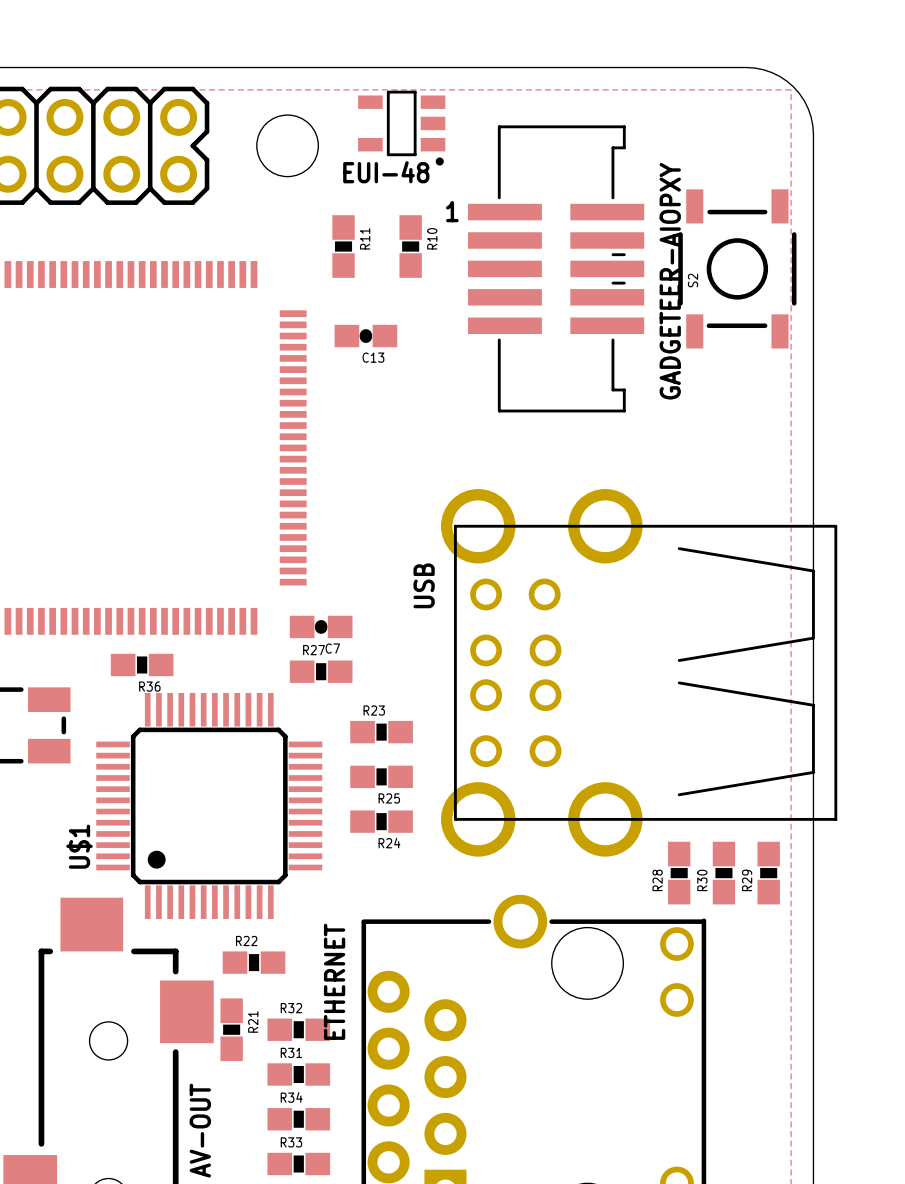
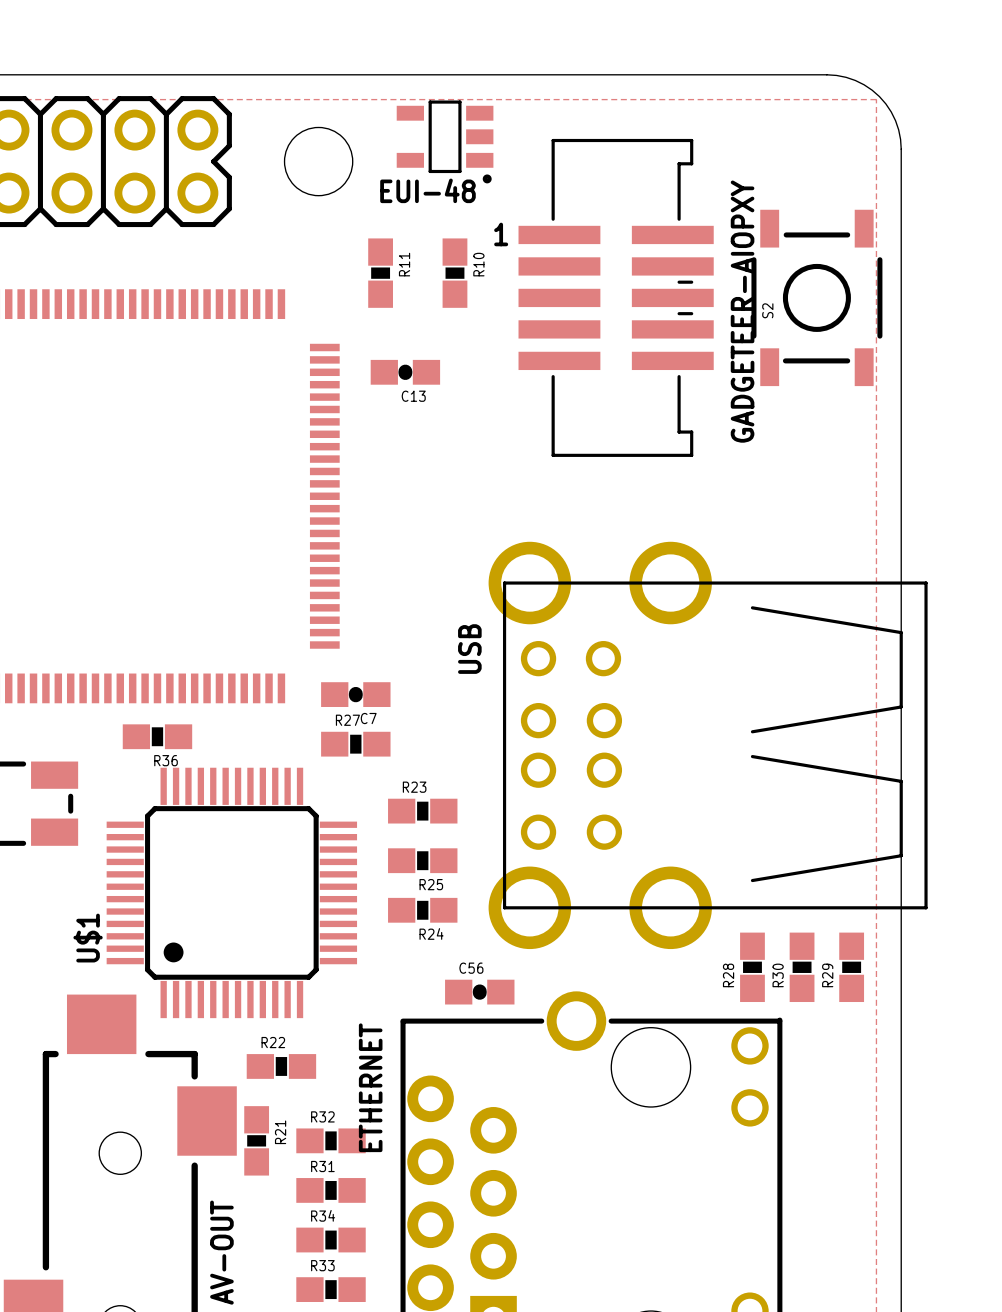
C56: none -> (479, 992)

